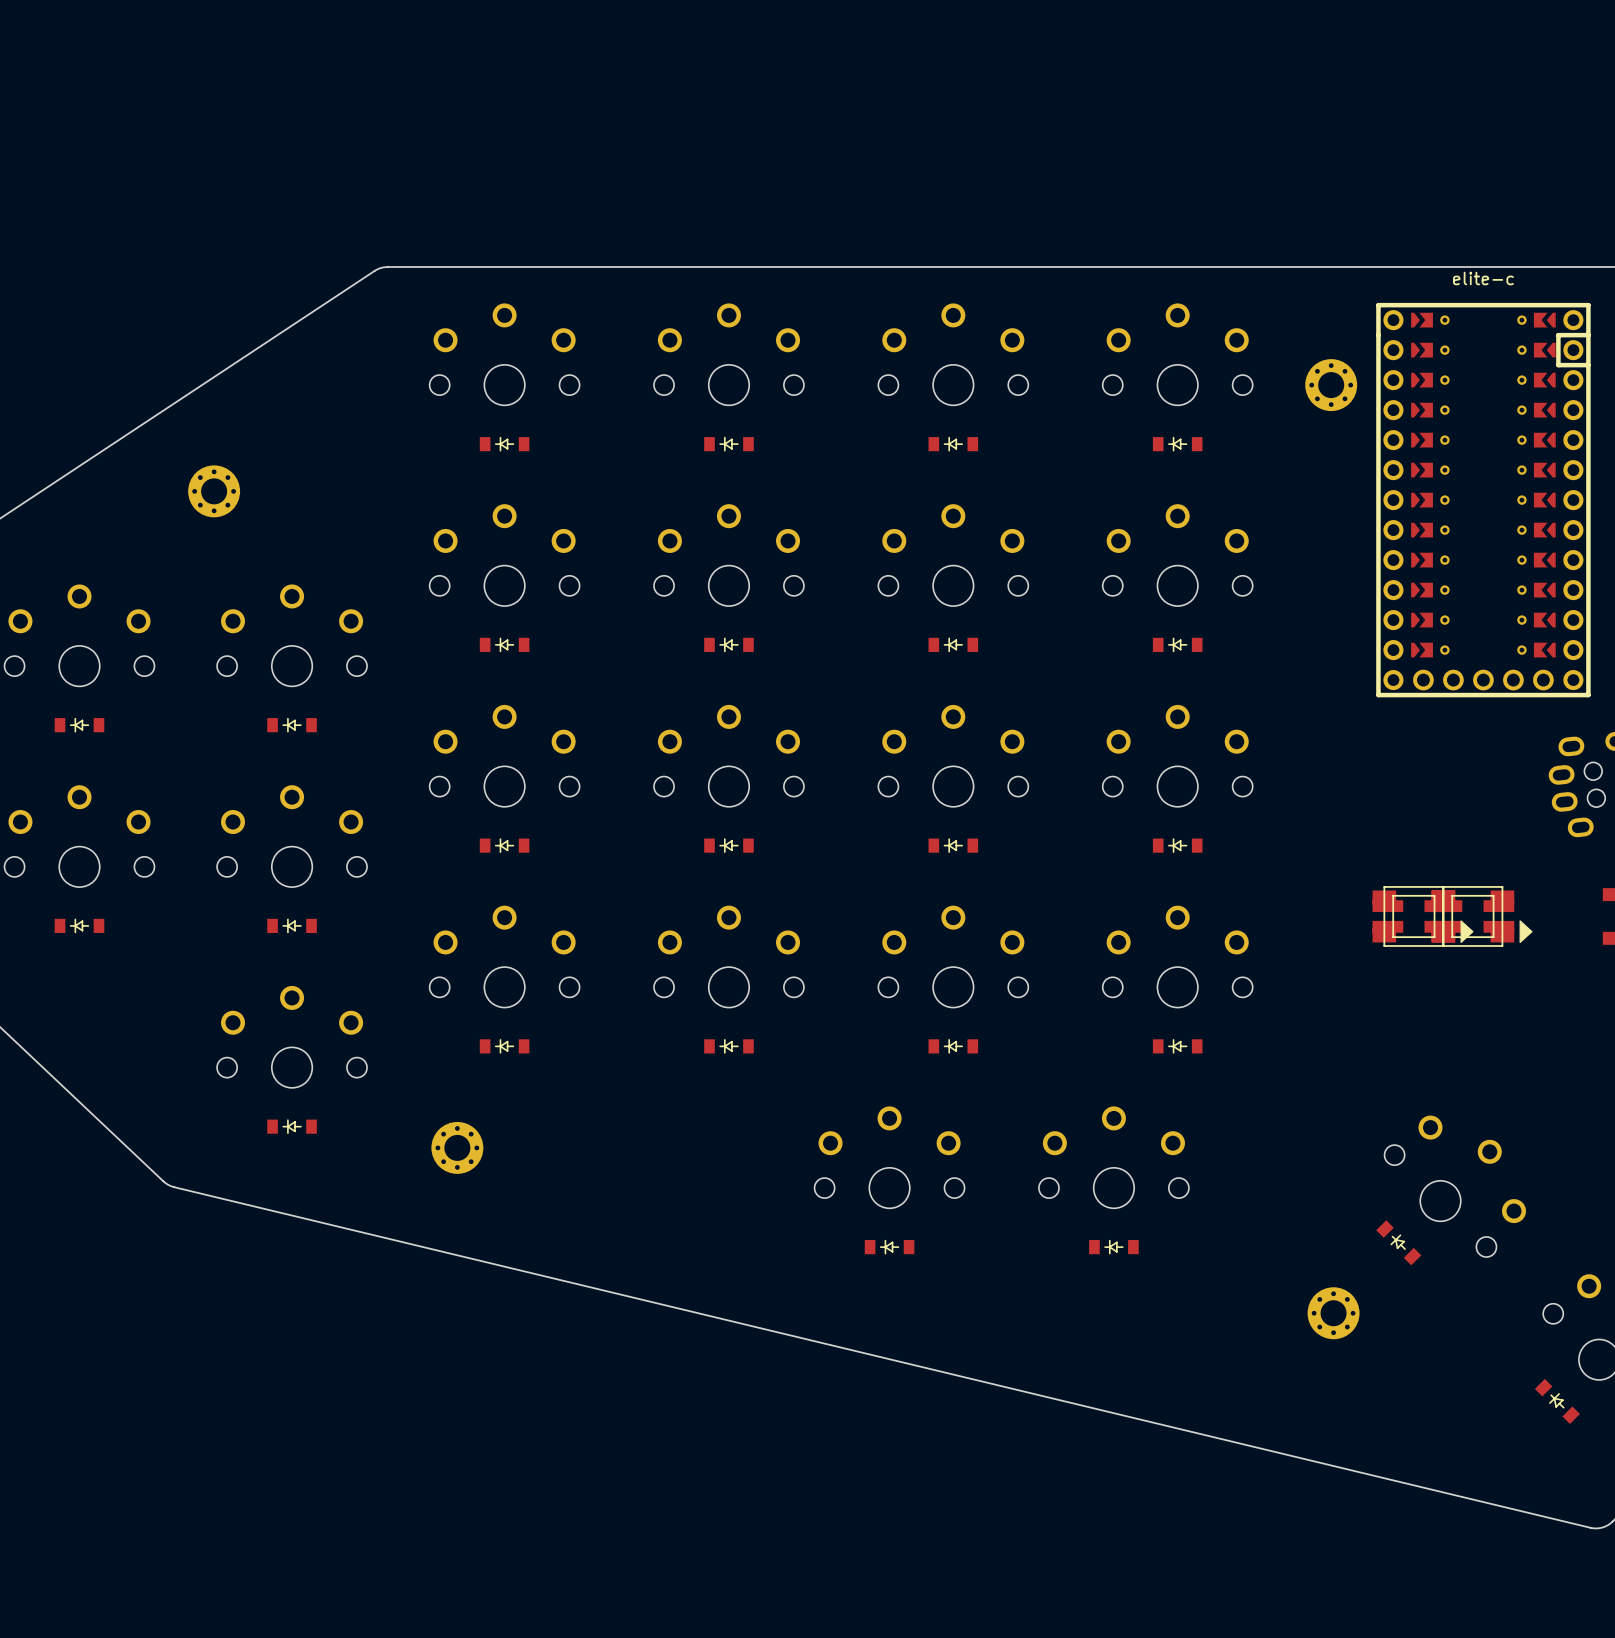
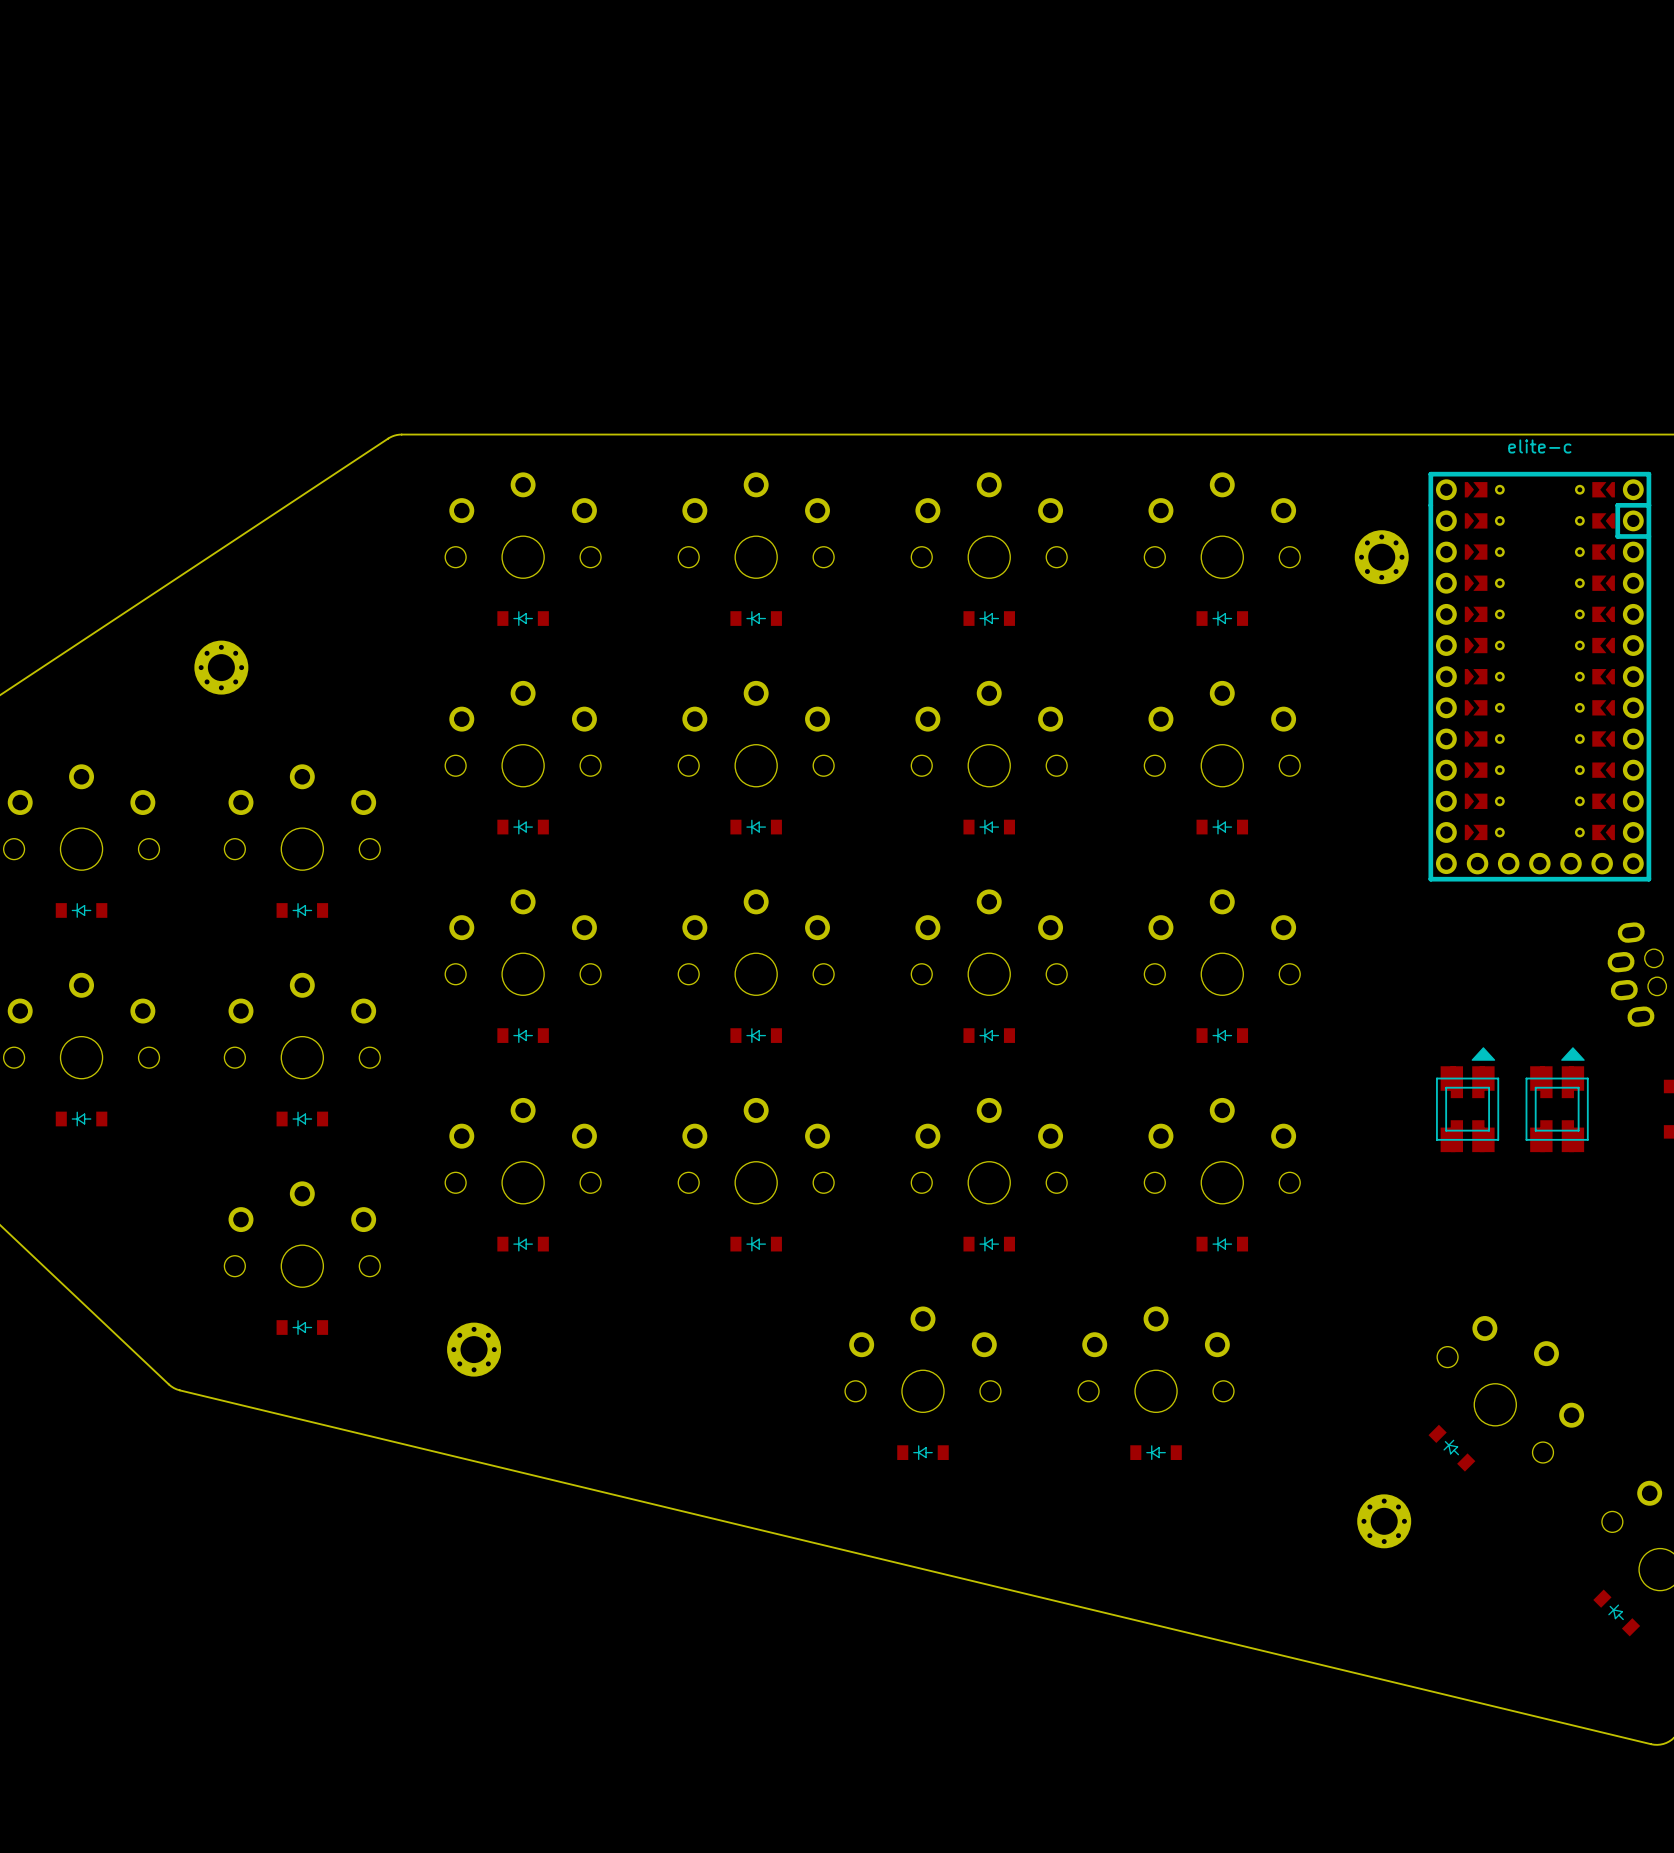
part rotation: 0° (1423, 916) -> 90° counterclockwise (1467, 1099)
part rotation: 0° (1482, 916) -> 90° counterclockwise (1557, 1099)

